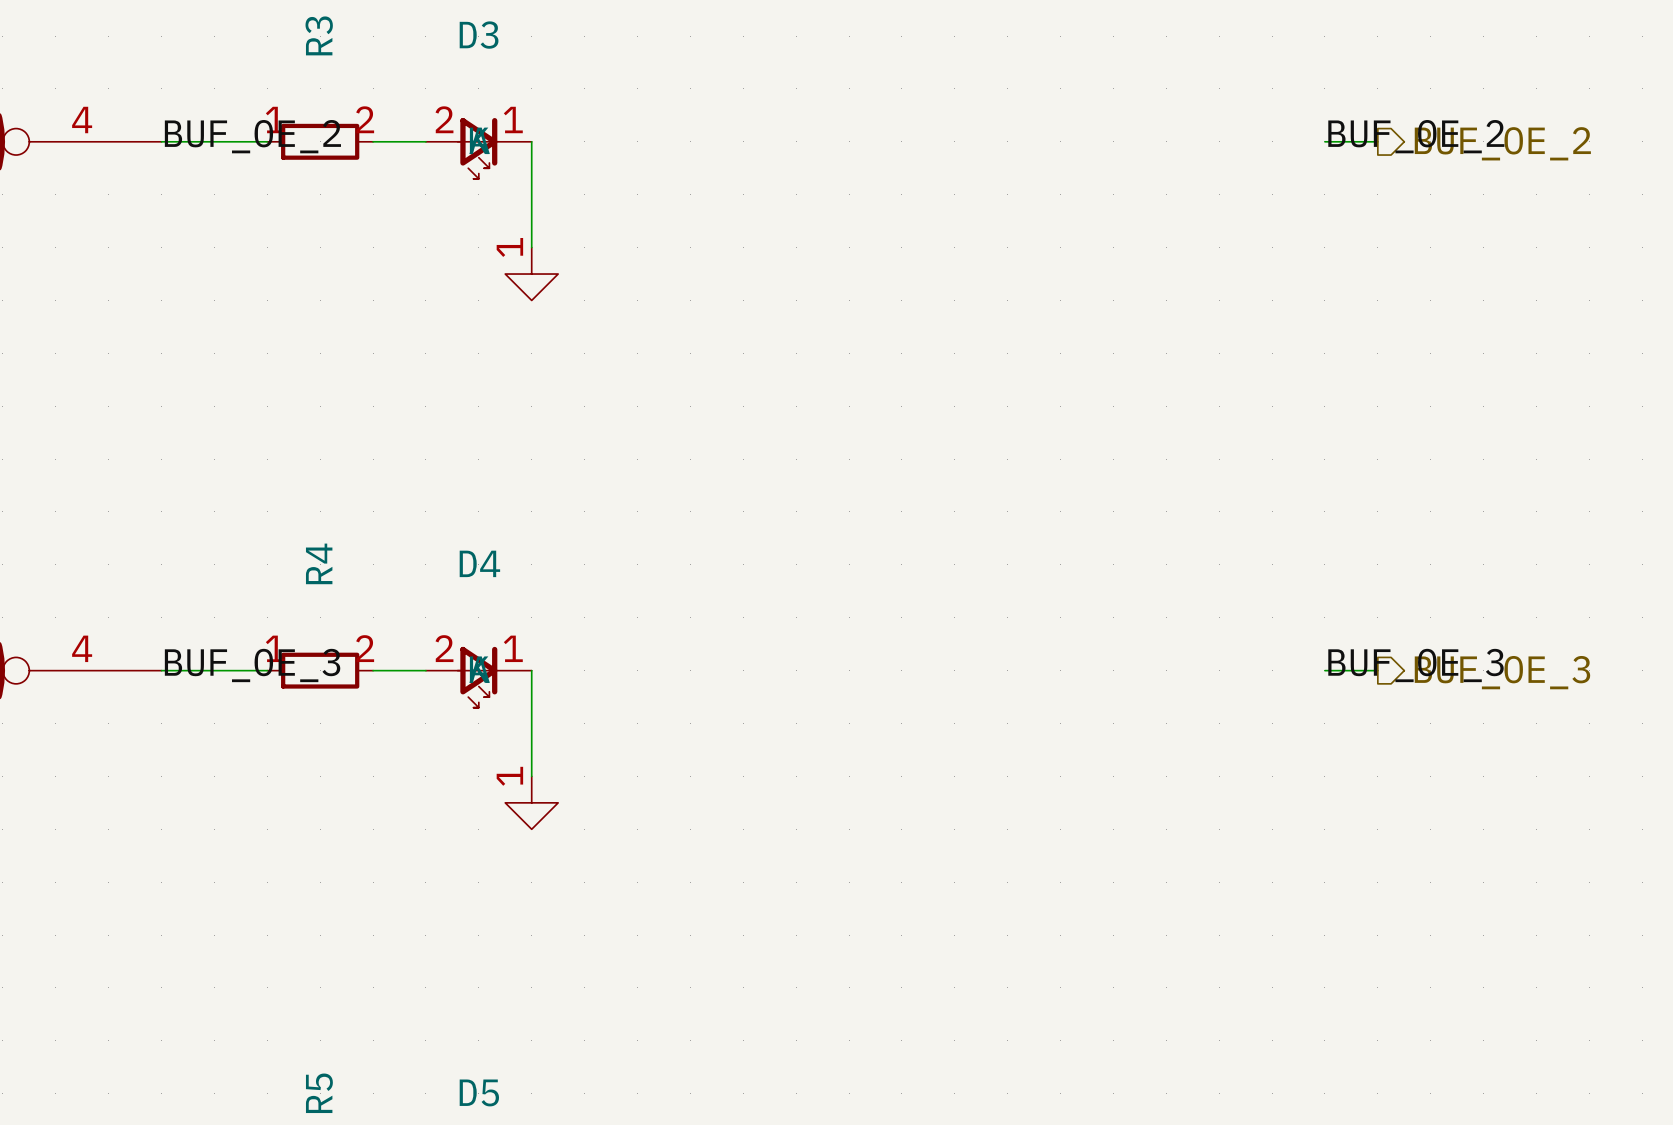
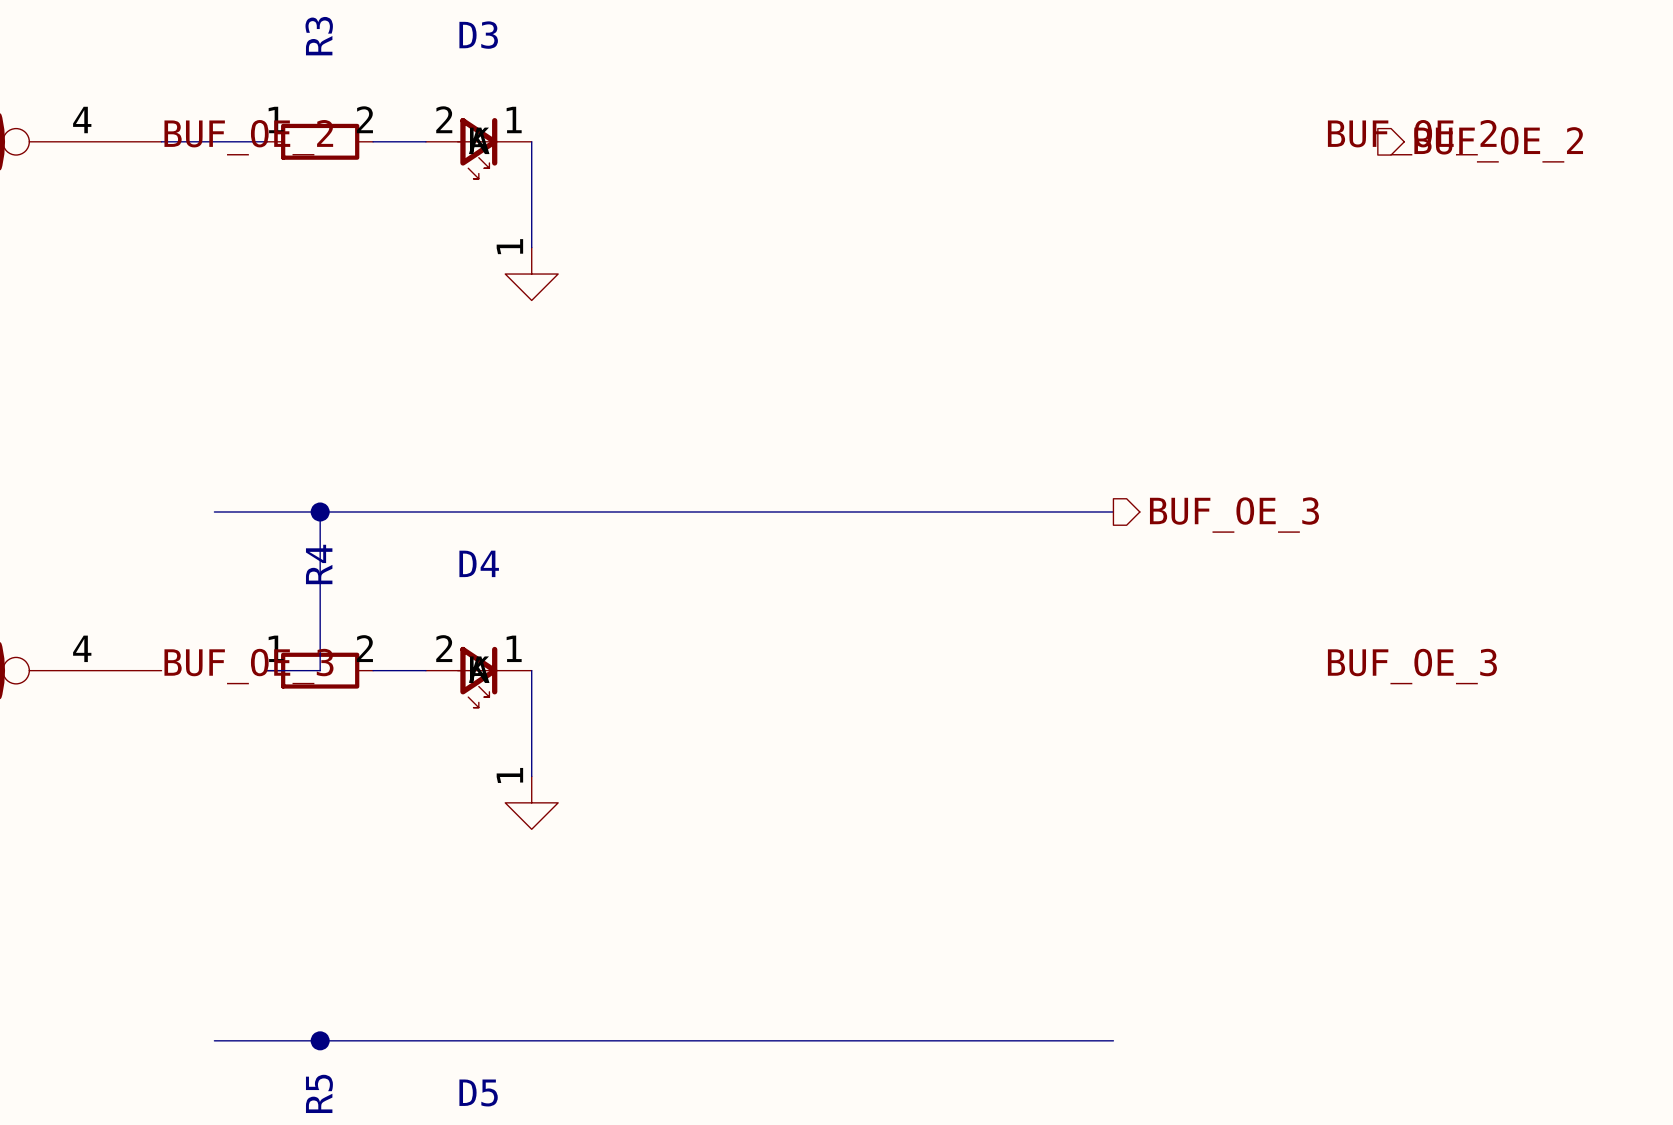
wire: (1324, 141) (1377, 141) -> none
wire: none -> (214, 511) (1113, 511)
junction: none -> (320, 511)
wire: (161, 670) (267, 670) -> (320, 511) (320, 670) (267, 670)
wire: (1324, 670) (1377, 670) -> none
hierarchical label position: BUF_OE_3 (1502, 672) -> BUF_OE_3 (1234, 515)
wire: none -> (214, 1040) (1113, 1040)
junction: none -> (320, 1040)

